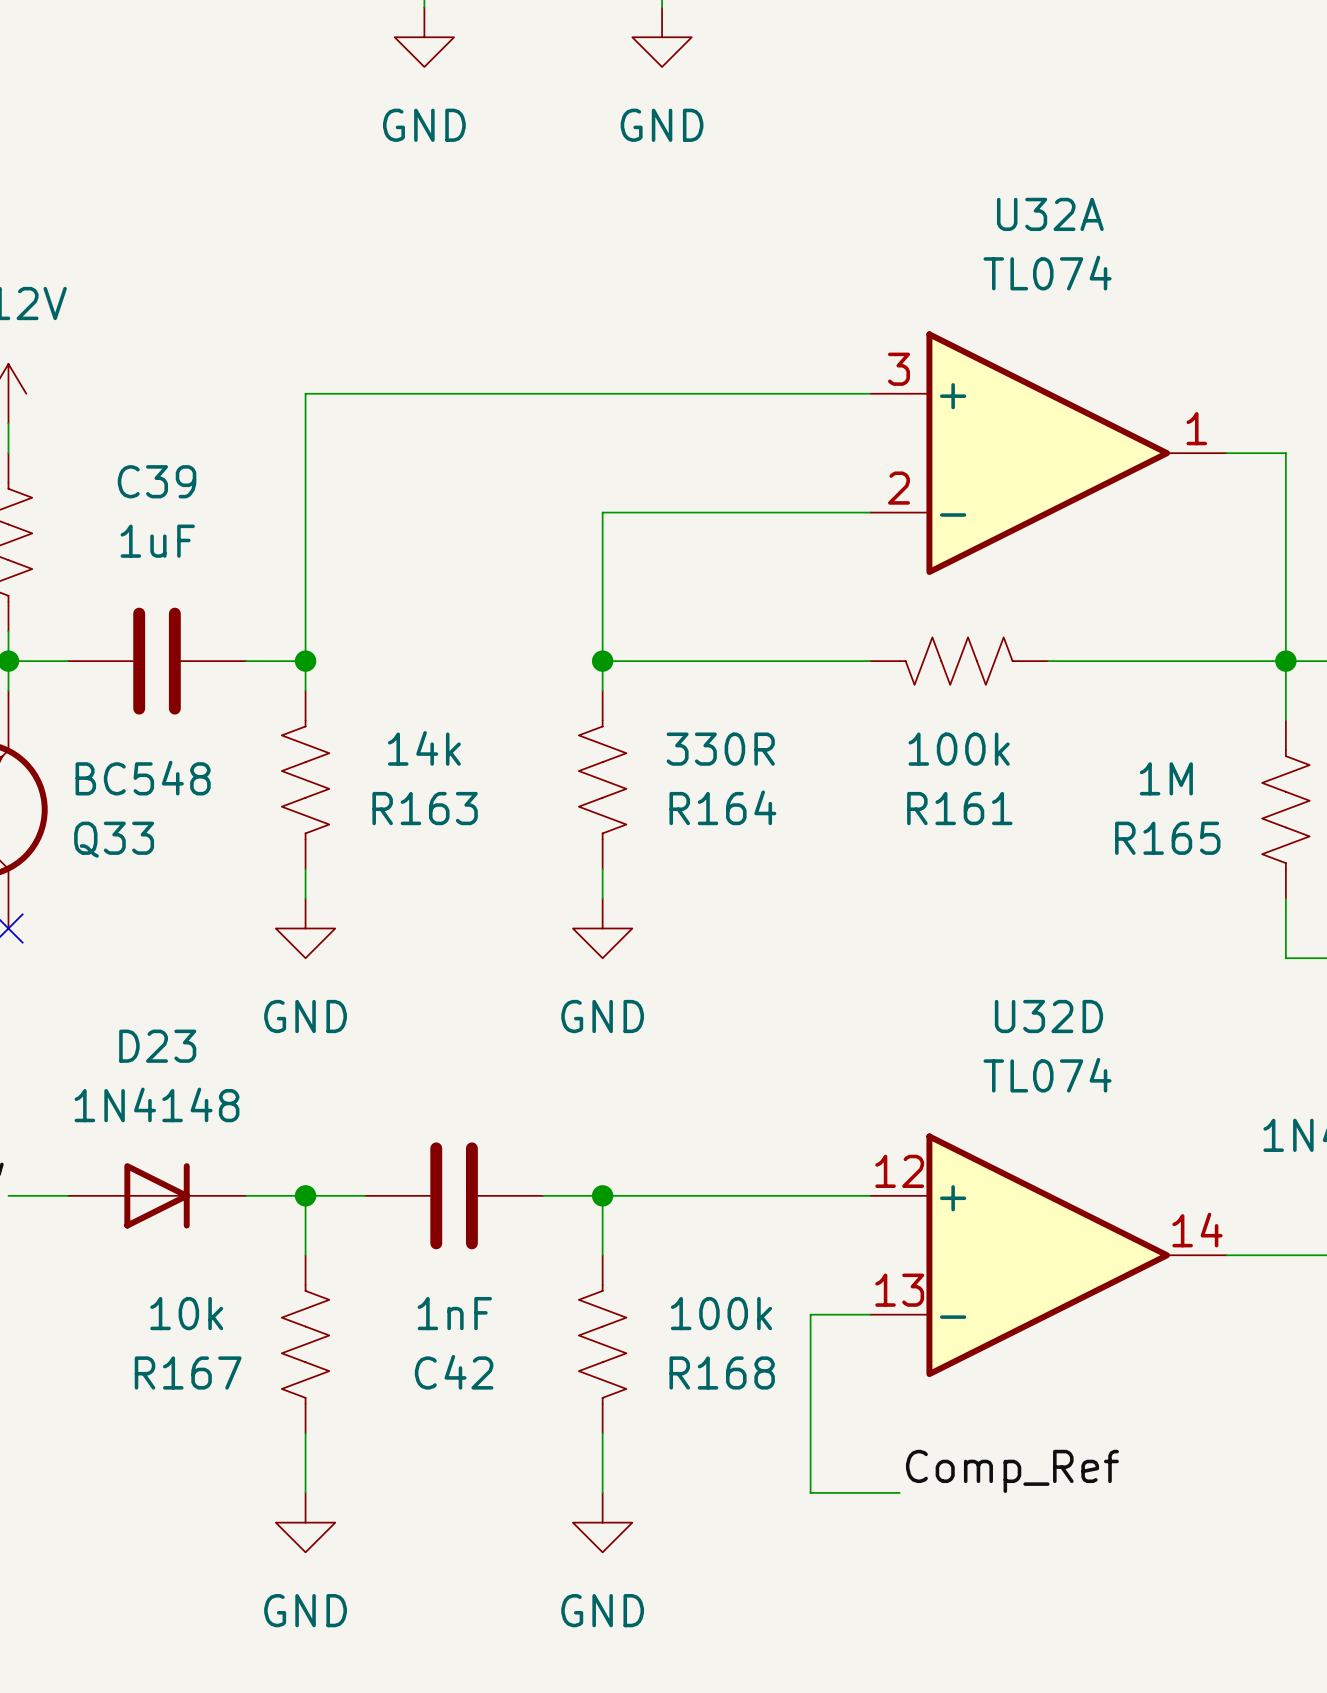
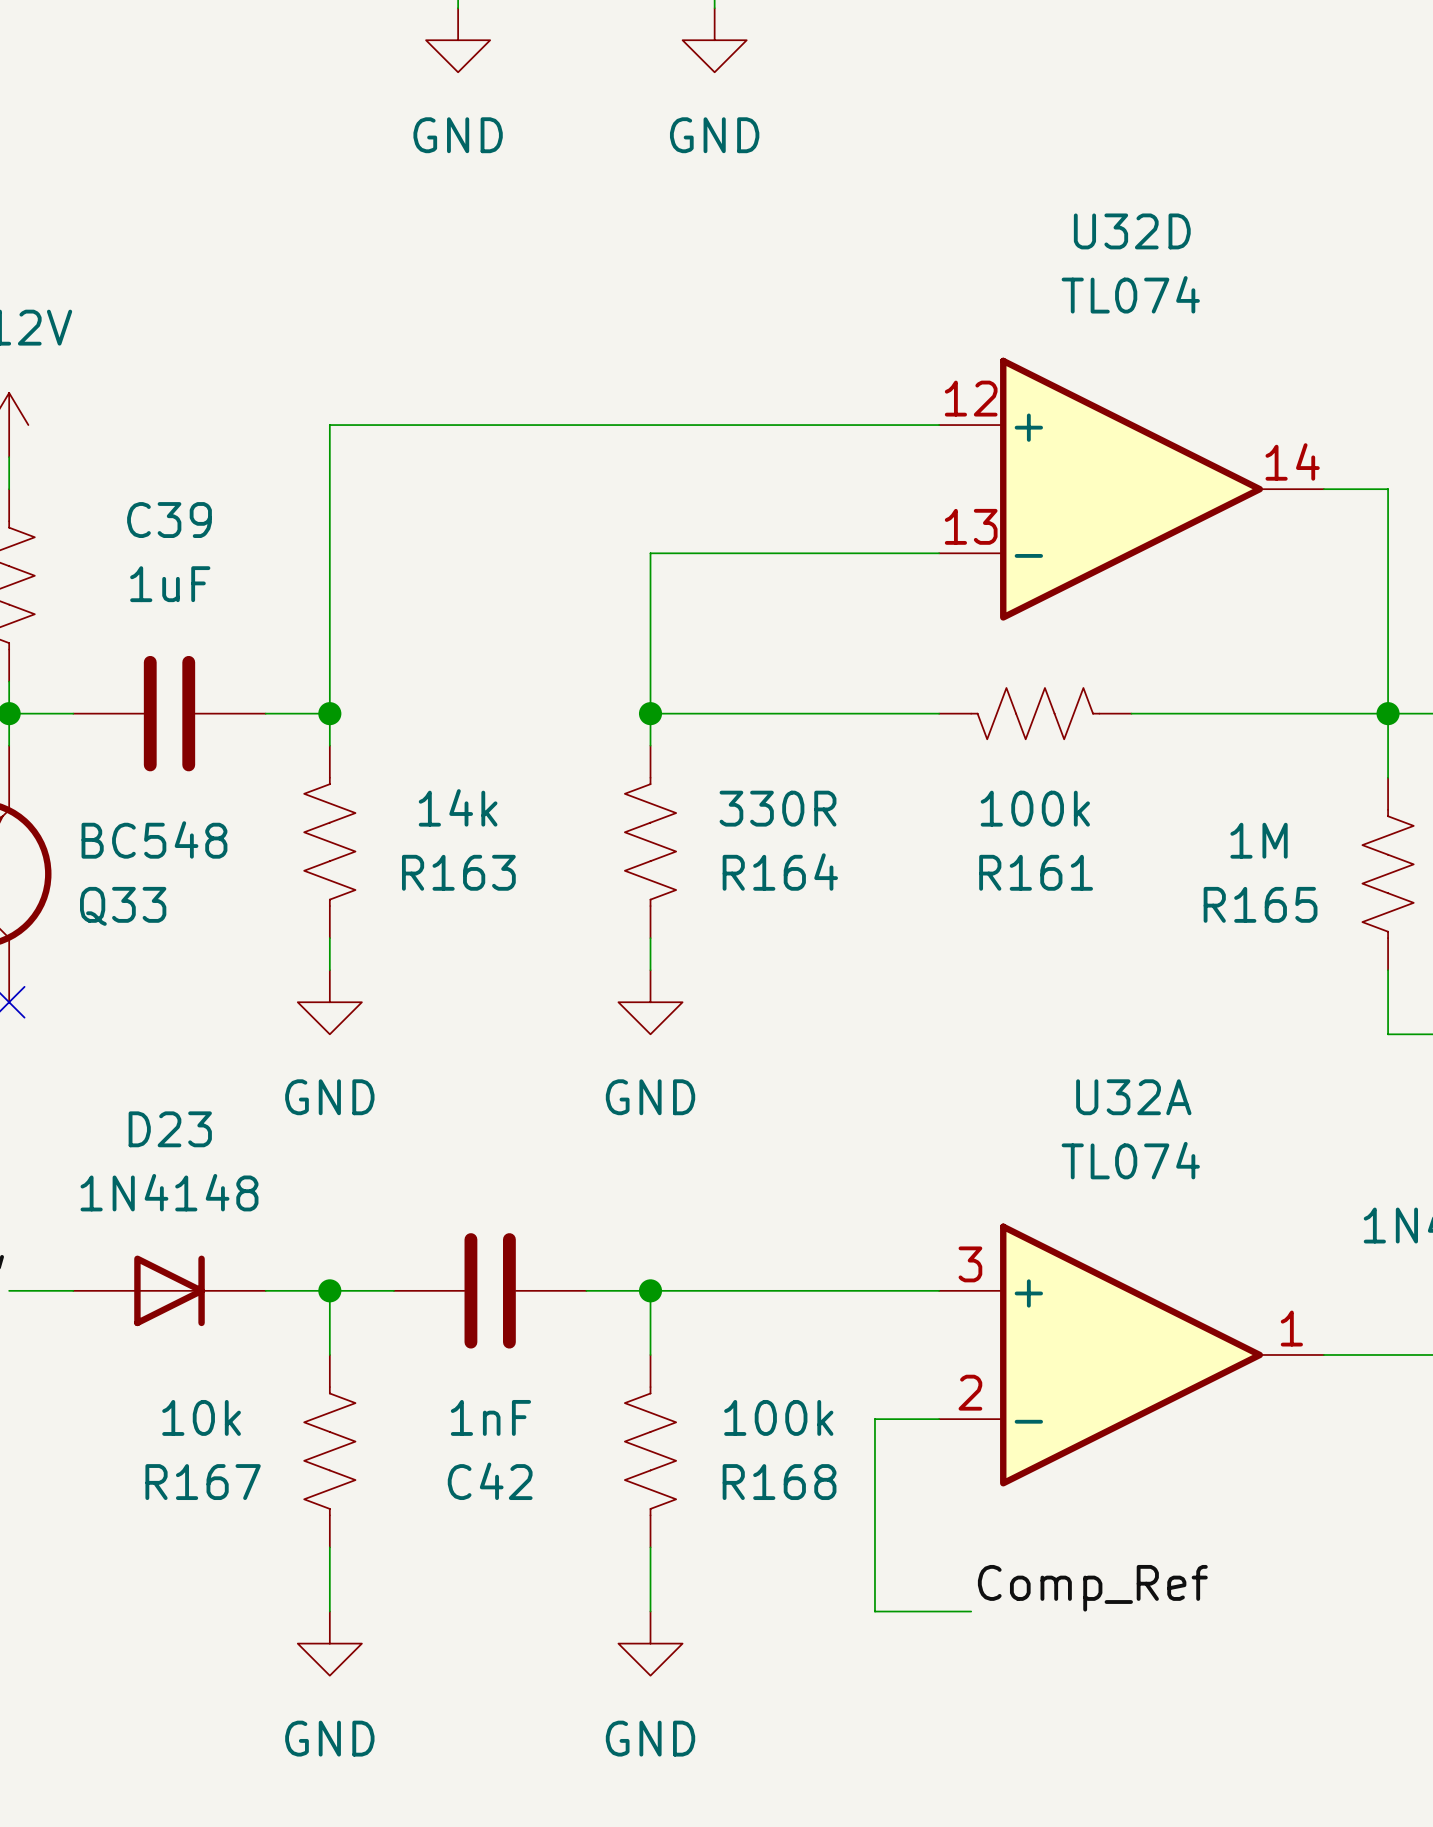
U32A position: (1048, 453) -> (1131, 1354)
U32D position: (1048, 1255) -> (1131, 489)

